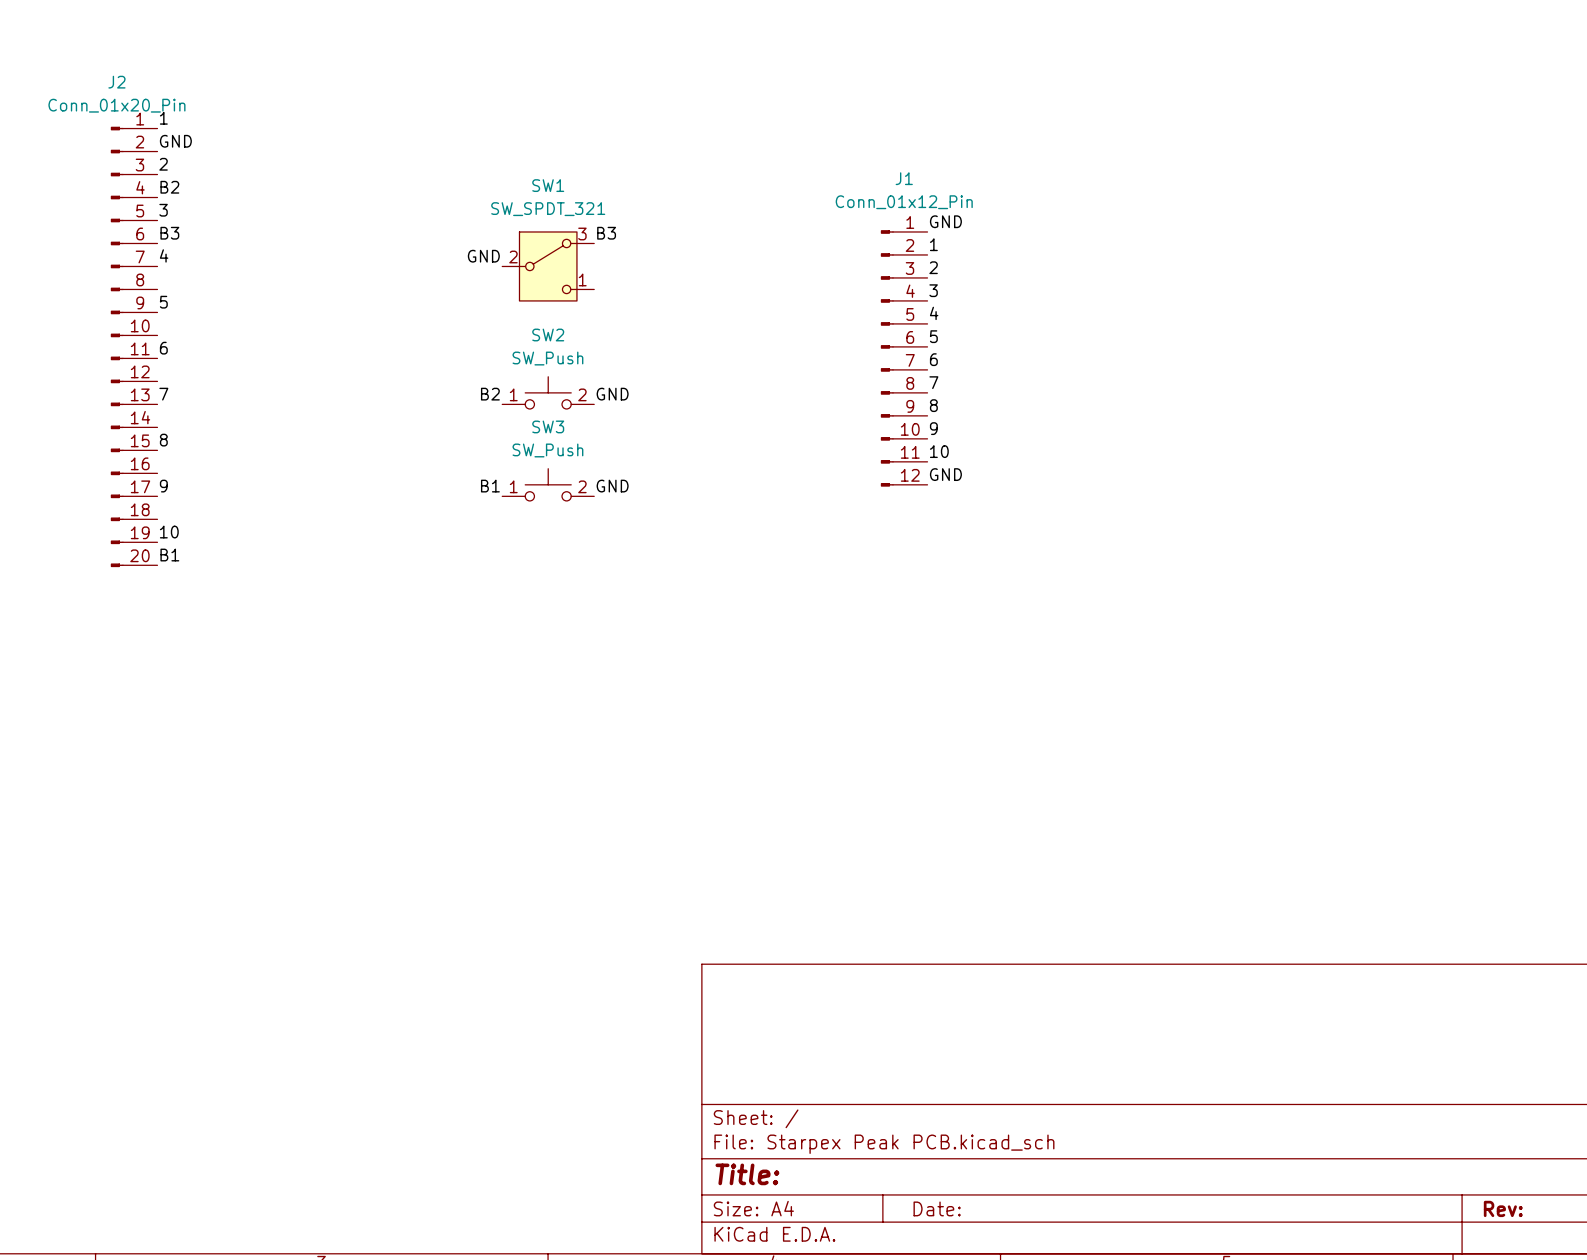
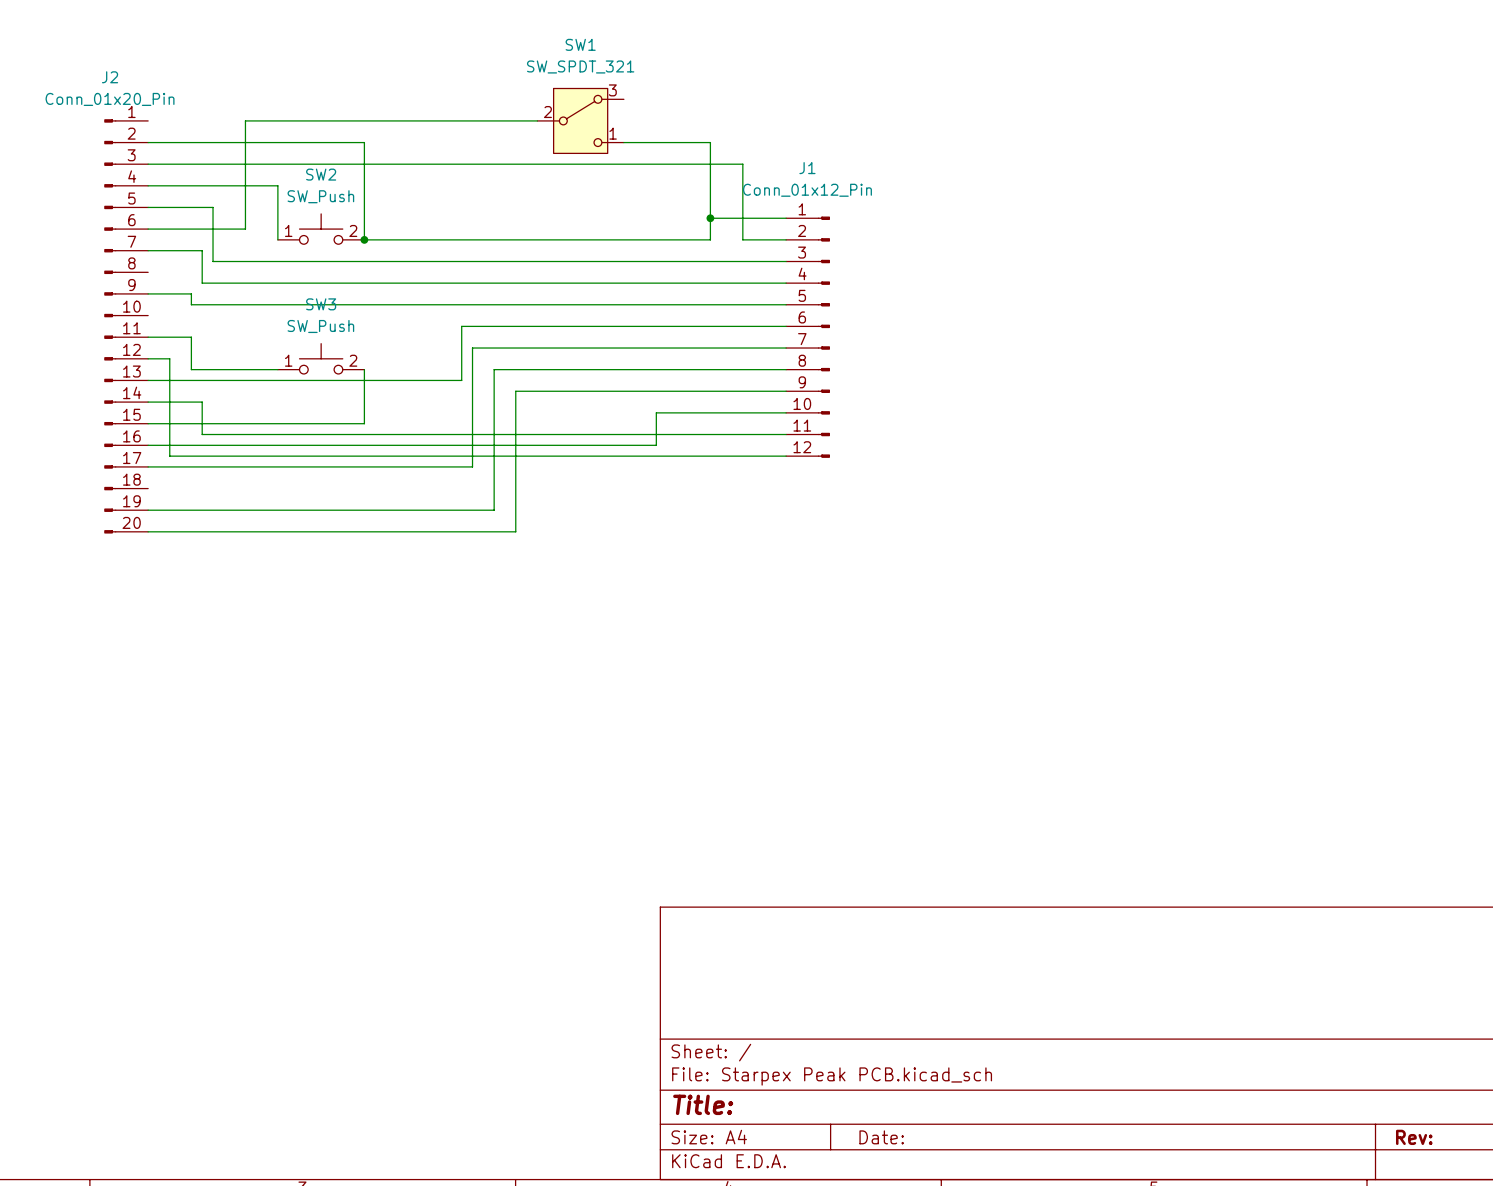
label: 1 (163, 118) -> none
wire: none -> (537, 120) (245, 120) (245, 229) (148, 229)
label: GND (175, 141) -> none
wire: none -> (148, 142) (364, 142) (364, 239) (710, 239) (710, 142) (623, 142)
label: 2 (163, 164) -> none
wire: none -> (148, 164) (742, 164) (742, 239) (786, 239)
label: B2 (169, 187) -> none
wire: none -> (148, 185) (277, 185) (277, 239)
label: 3 (163, 210) -> none
wire: none -> (148, 207) (213, 207) (213, 261) (786, 261)
label: GND (945, 221) -> none
wire: none -> (710, 218) (786, 218)
junction: none -> (710, 218)
label: B3 (169, 233) -> none
label: B3 (606, 233) -> none
label: 1 (933, 244) -> none
junction: none -> (364, 239)
label: 4 (164, 255) -> none
label: GND (483, 256) -> none
wire: none -> (148, 250) (202, 250) (202, 283) (786, 283)
SW1 position: (548, 266) -> (580, 120)
label: 2 (933, 267) -> none
label: 3 (933, 290) -> none
label: 5 (163, 302) -> none
wire: none -> (148, 293) (191, 293) (191, 304) (786, 304)
label: 4 (934, 313) -> none
label: 5 (933, 336) -> none
wire: none -> (786, 326) (461, 326) (461, 380) (148, 380)
label: 6 (163, 348) -> none
wire: none -> (148, 337) (191, 337) (191, 369) (277, 369)
J1 flip: as is (887, 358) -> left-right (823, 337)
label: 6 (933, 359) -> none
wire: none -> (786, 348) (472, 348) (472, 466) (148, 466)
wire: none -> (148, 358) (169, 358) (169, 456) (786, 456)
label: 7 (933, 382) -> none
wire: none -> (364, 369) (364, 423) (148, 423)
SW2 position: (548, 392) -> (321, 229)
wire: none -> (786, 369) (494, 369) (494, 510) (148, 510)
label: 7 (163, 394) -> none
label: B2 (490, 394) -> none
label: GND (612, 394) -> none
label: 8 (933, 405) -> none
wire: none -> (786, 391) (515, 391) (515, 531) (148, 531)
wire: none -> (148, 402) (202, 402) (202, 434) (786, 434)
label: 9 (933, 428) -> none
wire: none -> (786, 412) (656, 412) (656, 445) (148, 445)
label: 8 (163, 440) -> none
label: 10 (939, 451) -> none
label: GND (945, 474) -> none
SW3 position: (548, 484) -> (321, 358)
label: 9 (163, 486) -> none
label: B1 (490, 486) -> none
label: GND (612, 486) -> none
label: 10 (169, 532) -> none
label: B1 (169, 555) -> none

